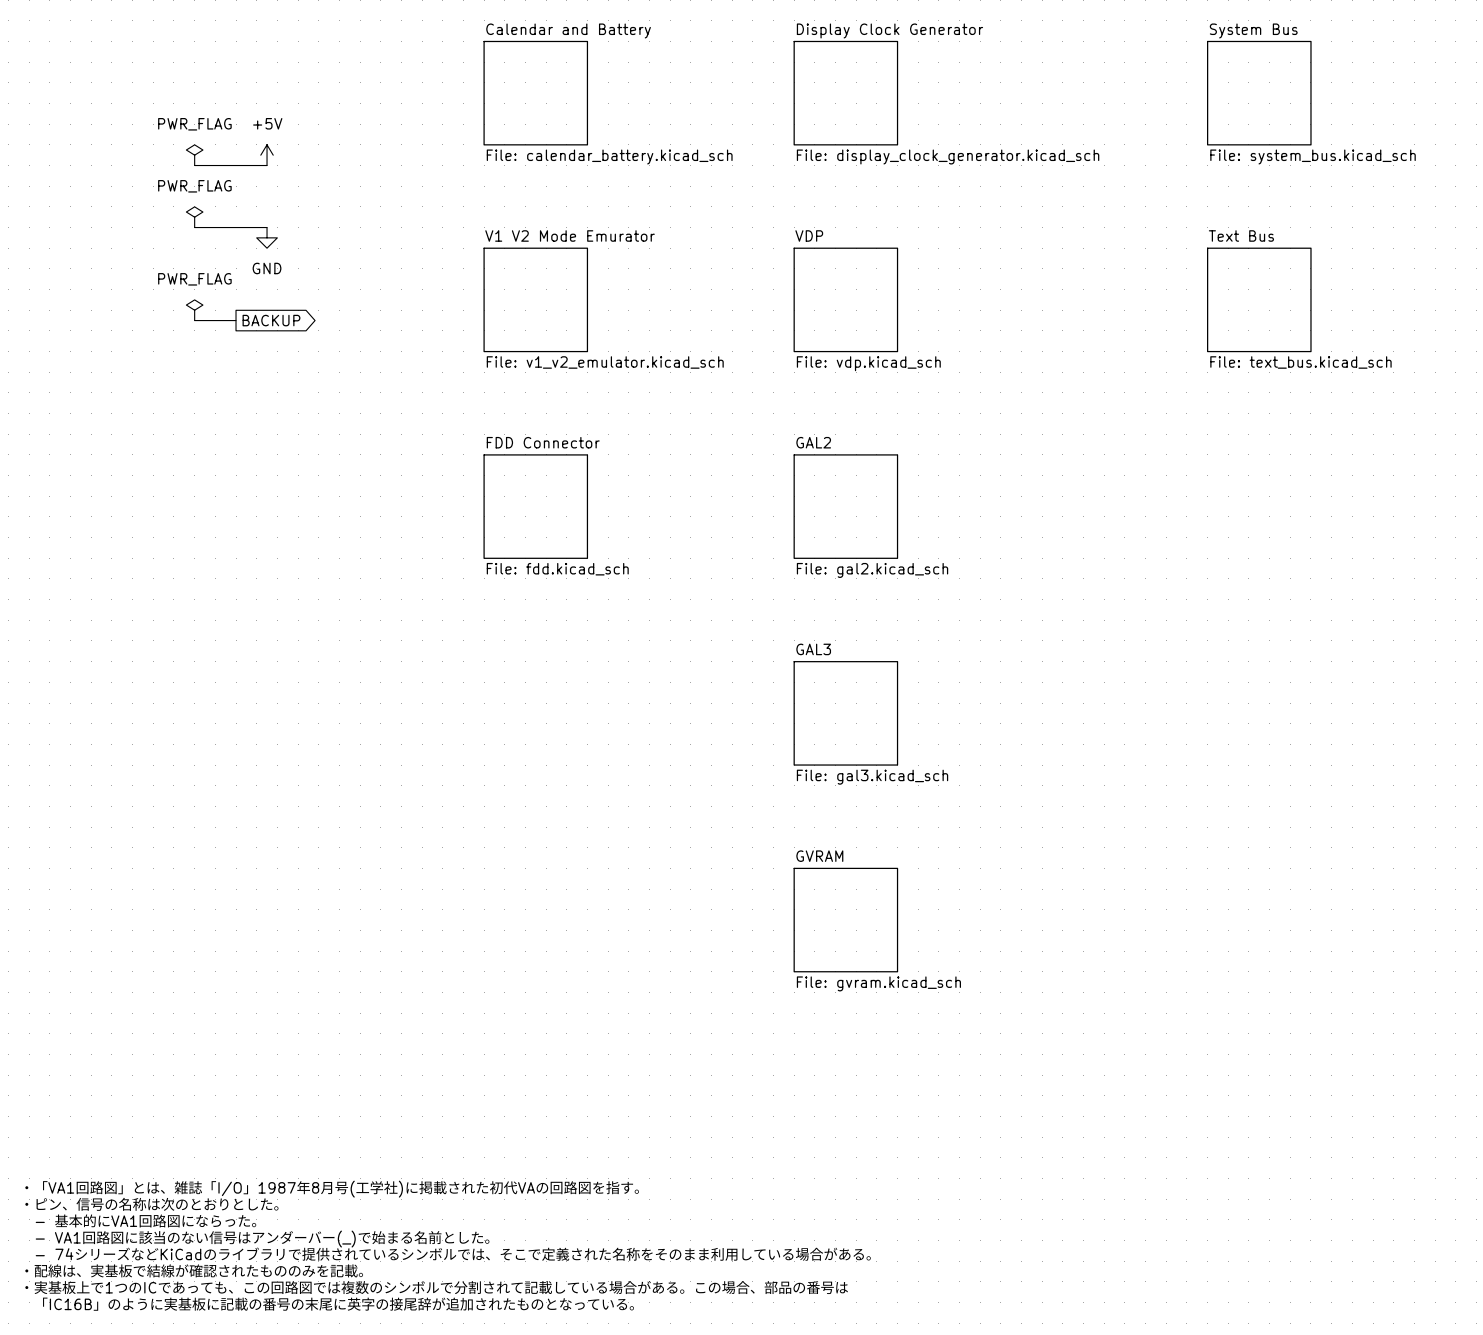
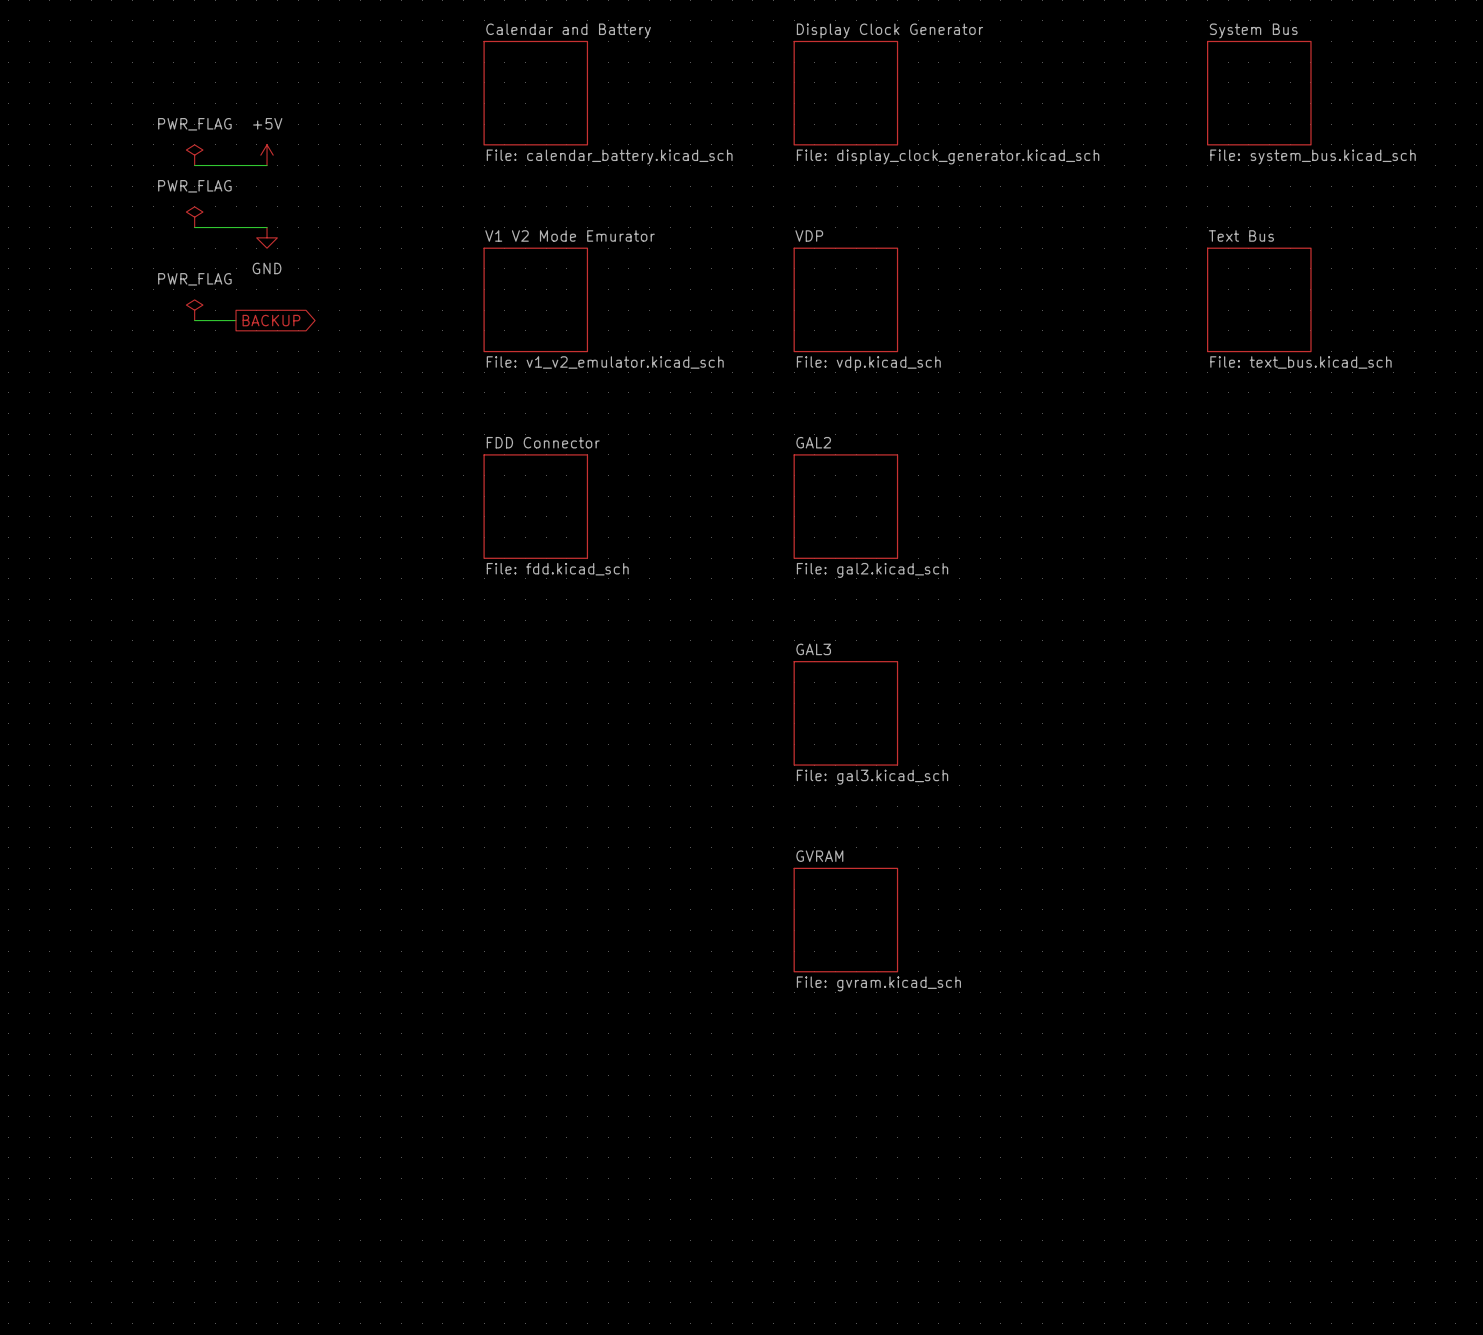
text: ・「VA1回路図」とは、雑誌「I/O」1987年8月号(工学社)に掲載された初代VAの回路図を指す。 (332, 1189) -> none
text: ・ピン、信号の名称は次のとおりとした。 (151, 1204) -> none
text: - 基本的にVA1回路図にならった。 (146, 1220) -> none
text: - VA1回路図に該当のない信号はアンダーバー(_)で始まる名前とした。 (262, 1238) -> none
text: - 74シリーズなどKiCadのライブラリで提供されているシンボルでは、そこで定義された名称をそのまま利用している場合がある。 (453, 1254) -> none
text: ・配線は、実基板で結線が確認されたもののみを記載。 (194, 1270) -> none
text: ・実基板上で1つのICであっても、この回路図では複数のシンボルで分割されて記載している場合がある。この場合、部品の番号は (436, 1287) -> none
text: 「IC16B」のように実基板に記載の番号の末尾に英字の接尾辞が追加されたものとなっている。 (338, 1304) -> none

